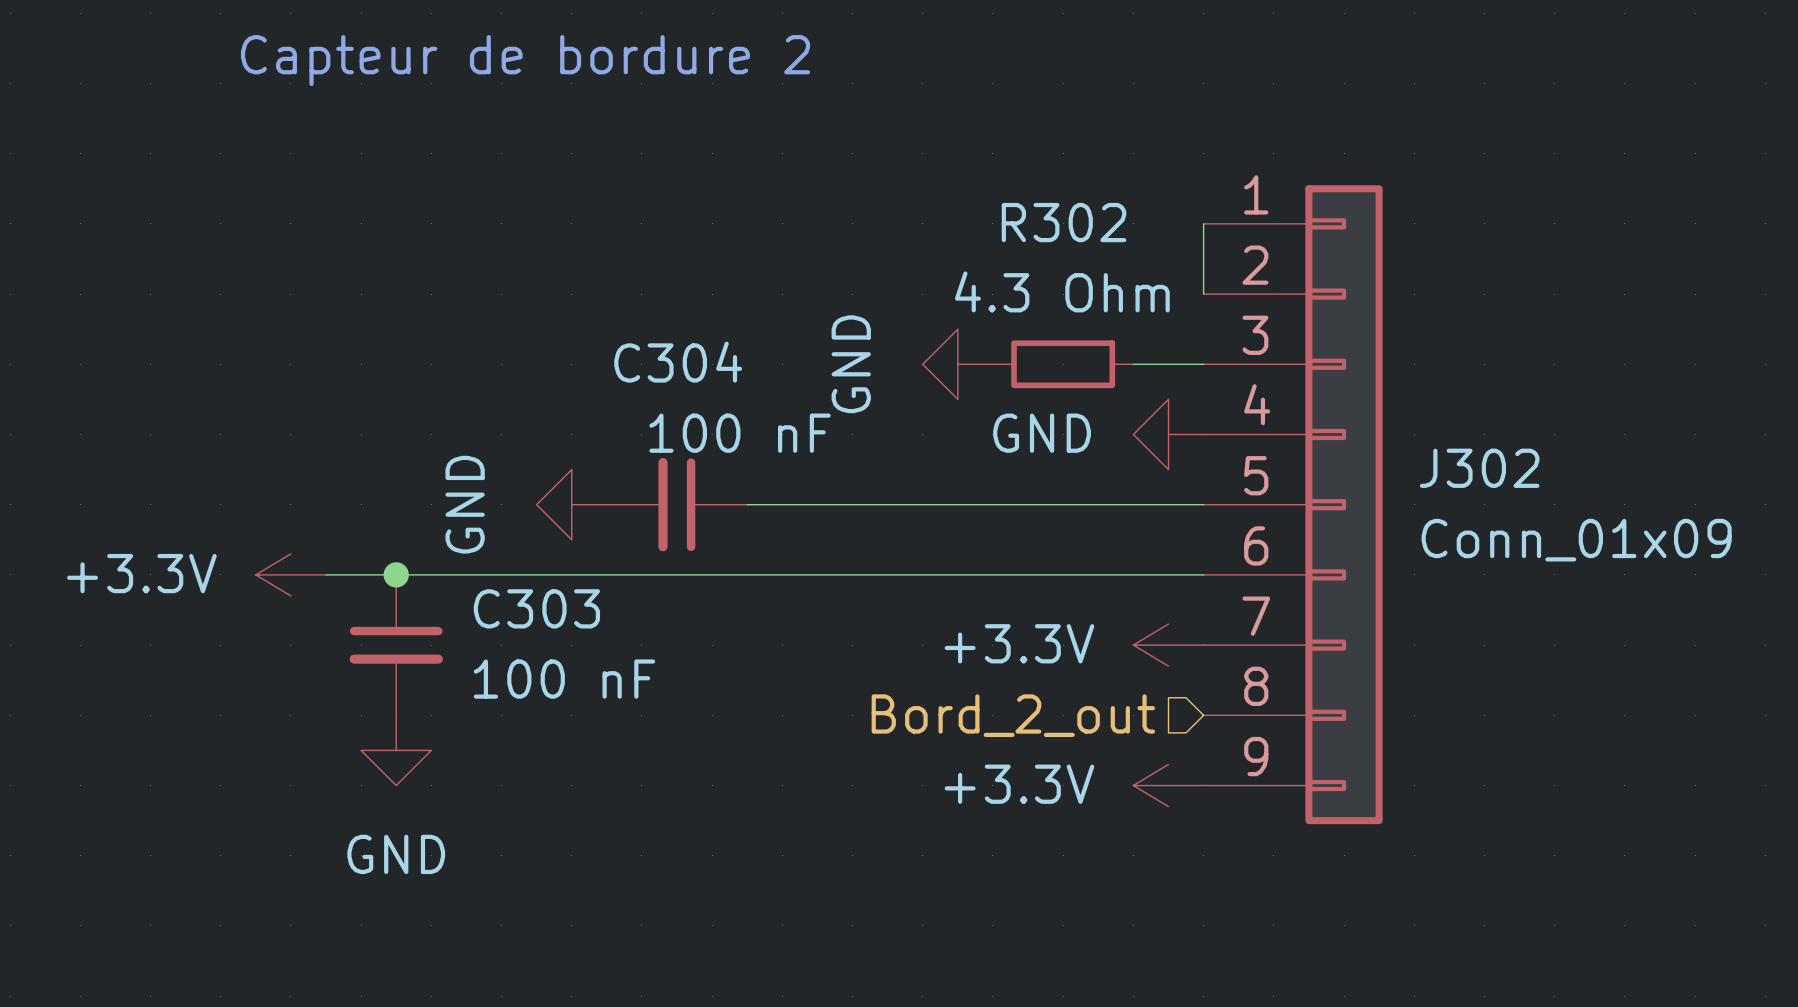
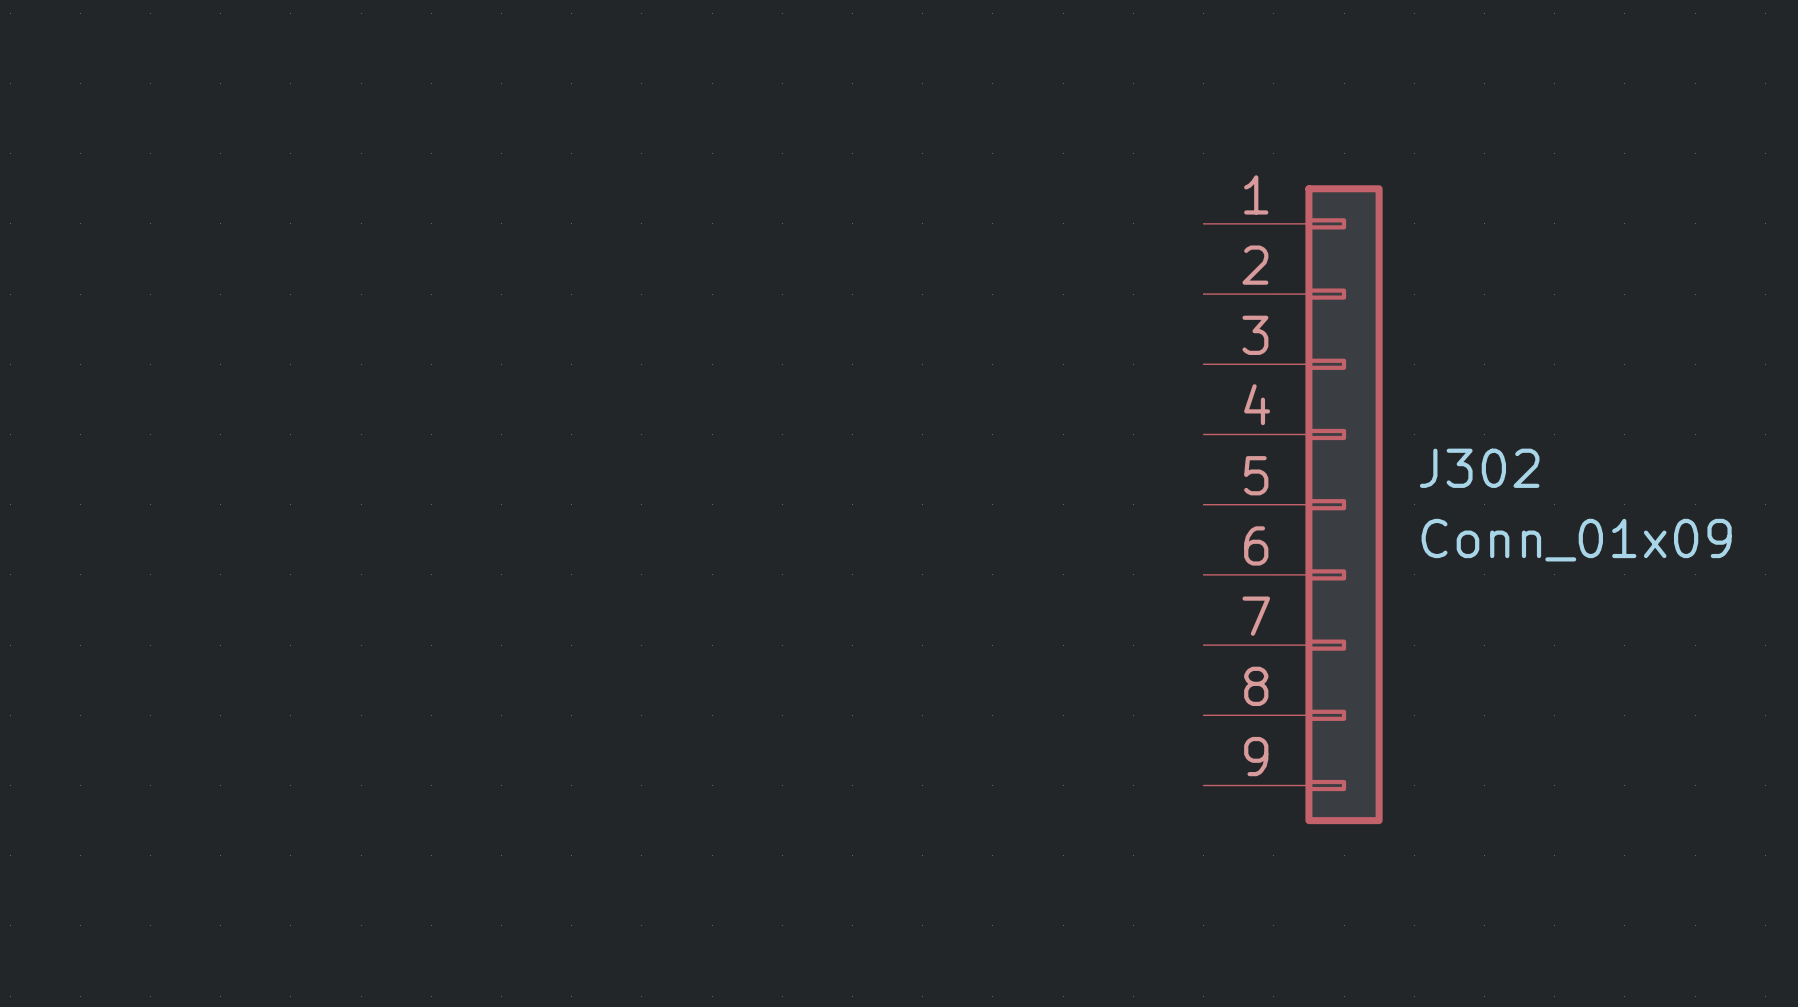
text: Capteur de bordure 2 (525, 60) -> none
wire: (1203, 223) (1203, 294) -> none
power symbol: GND (957, 364) -> none
R302: 4.3 Ohm (1063, 364) -> none
wire: (1133, 364) (1203, 364) -> none
power symbol: GND (1168, 434) -> none
power symbol: GND (571, 504) -> none
C304: 100 nF (677, 504) -> none
wire: (747, 504) (1203, 504) -> none
power symbol: +3.3V (290, 574) -> none
wire: (326, 574) (1203, 574) -> none
junction: (396, 574) -> none
C303: 100 nF (396, 645) -> none
power symbol: +3.3V (1168, 645) -> none
hierarchical label: Bord_2_out (1013, 715) -> none
power symbol: GND (396, 750) -> none
power symbol: +3.3V (1168, 785) -> none

